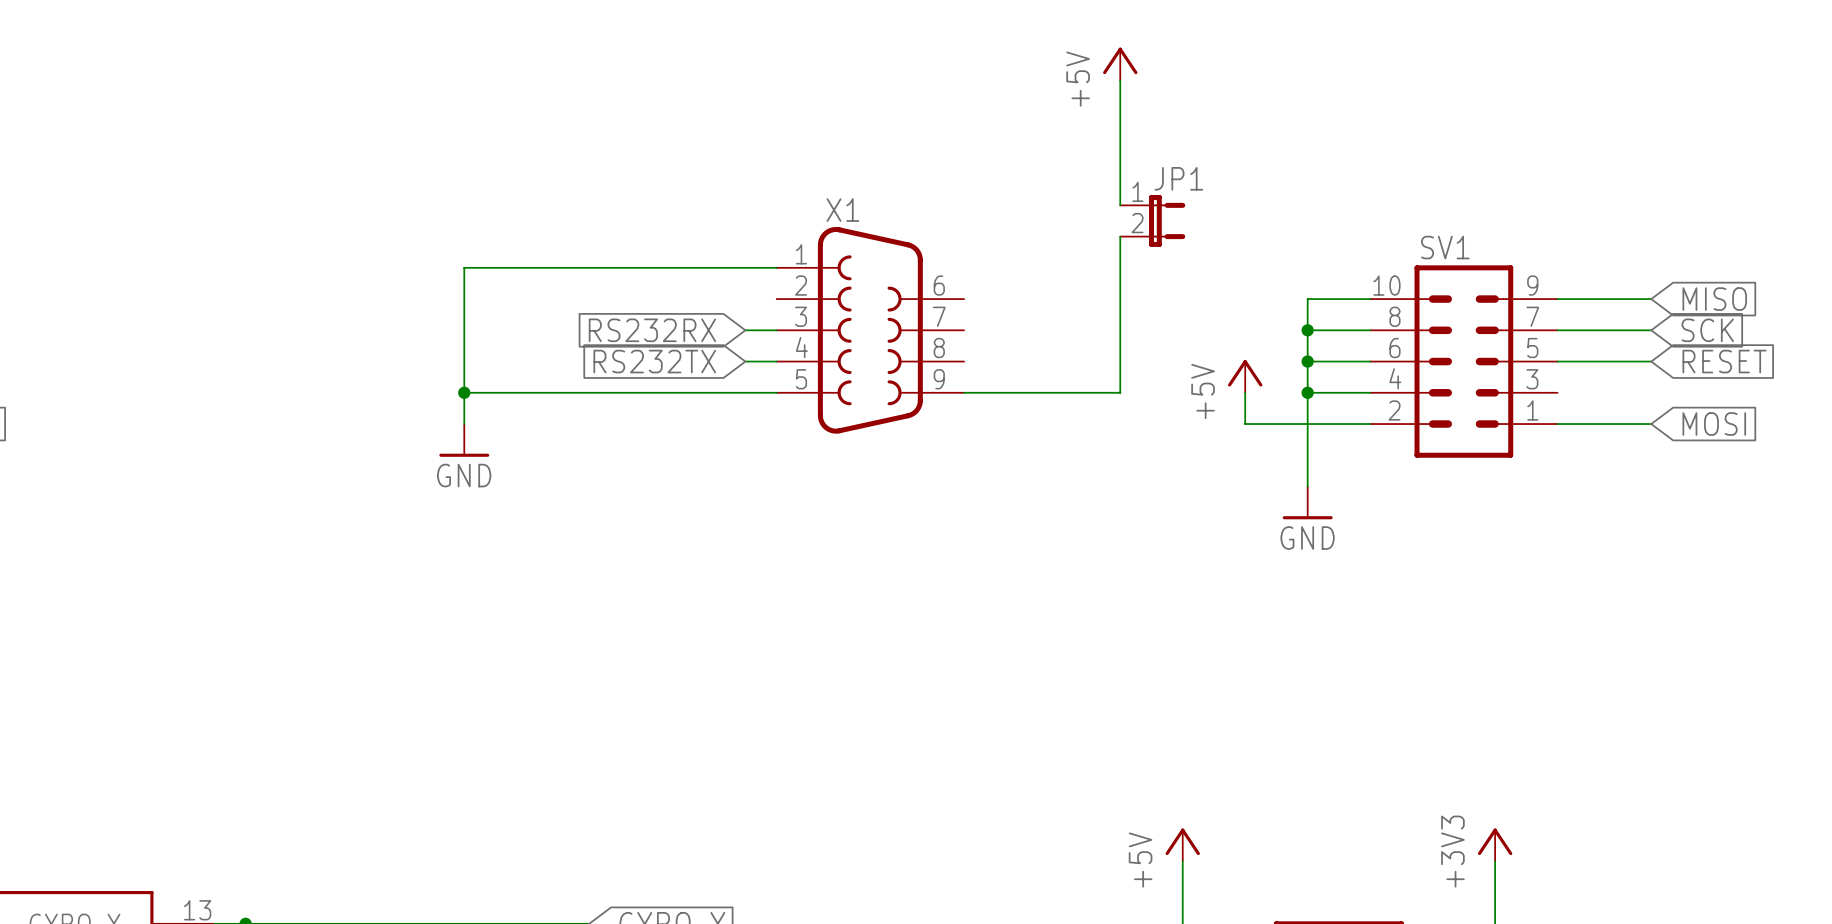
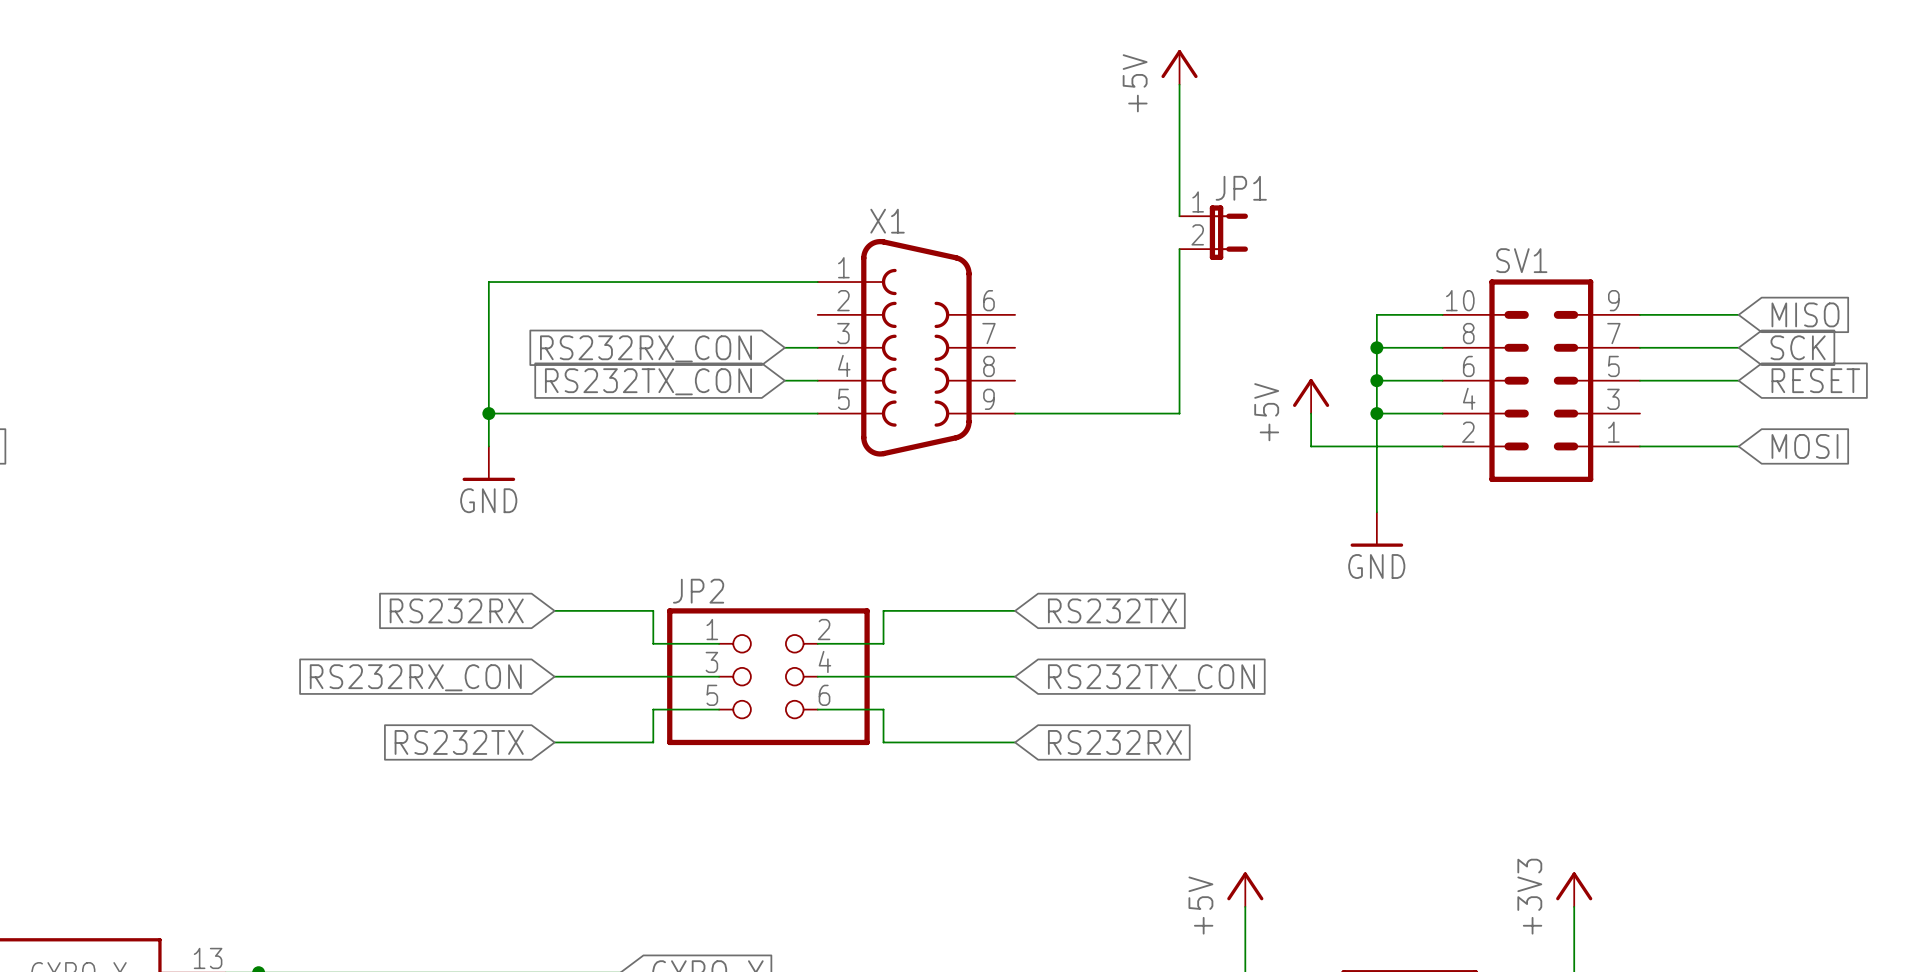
global label: RS232RX (652, 330) -> RS232RX_CON (646, 348)
global label: RS232TX (654, 361) -> RS232TX_CON (648, 381)
global label: none -> RS232RX (456, 610)
wire: none -> (554, 610) (653, 610) (653, 643) (719, 643)
wire: none -> (1015, 610) (883, 610) (883, 643) (817, 643)
global label: none -> RS232TX (1112, 610)
wire: none -> (554, 676) (719, 676)
JP2: none -> (768, 676)
wire: none -> (817, 676) (1015, 676)
global label: none -> RS232RX_CON (415, 677)
global label: none -> RS232TX_CON (1151, 677)
wire: none -> (719, 709) (653, 709) (653, 742) (554, 742)
wire: none -> (817, 709) (883, 709) (883, 742) (1015, 742)
global label: none -> RS232TX (459, 742)
global label: none -> RS232RX (1114, 742)

